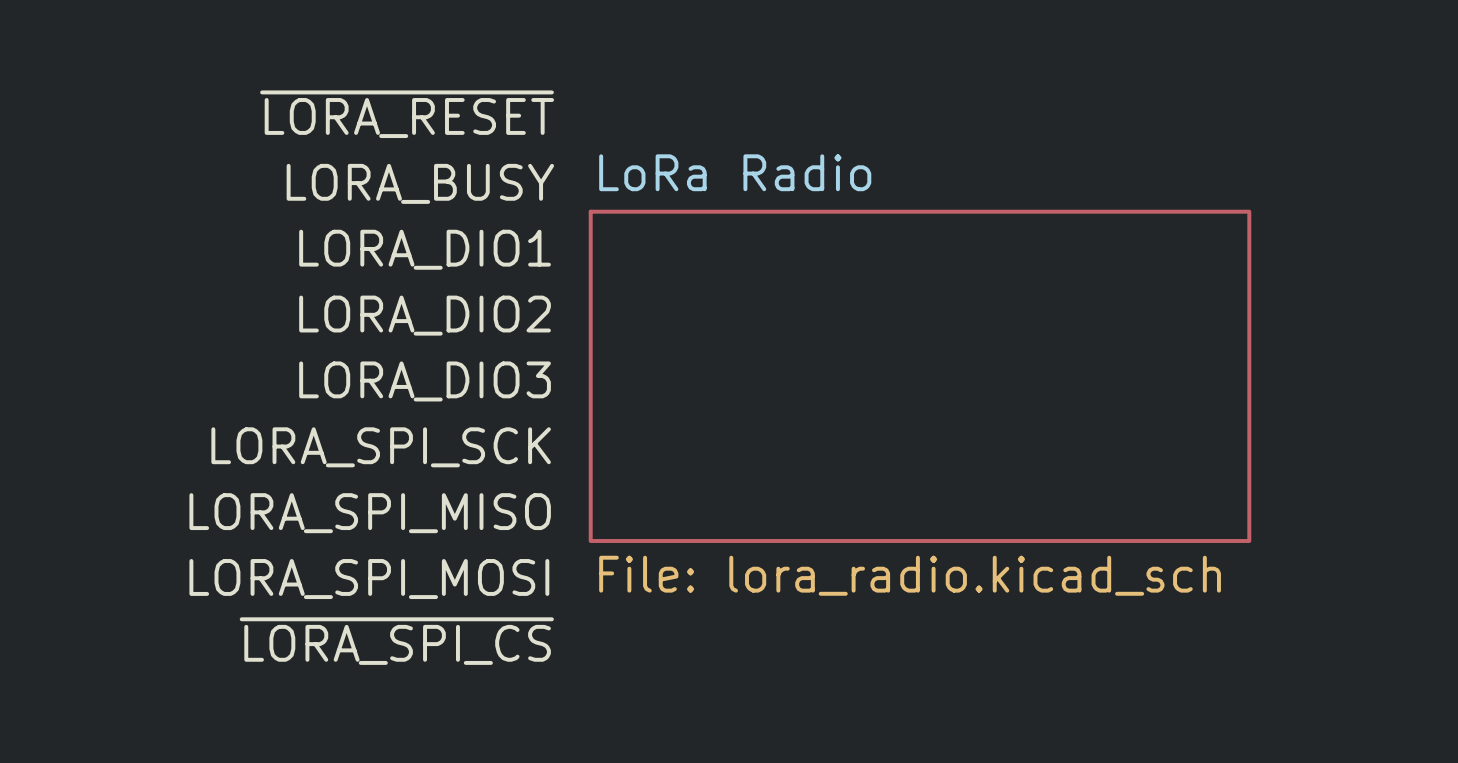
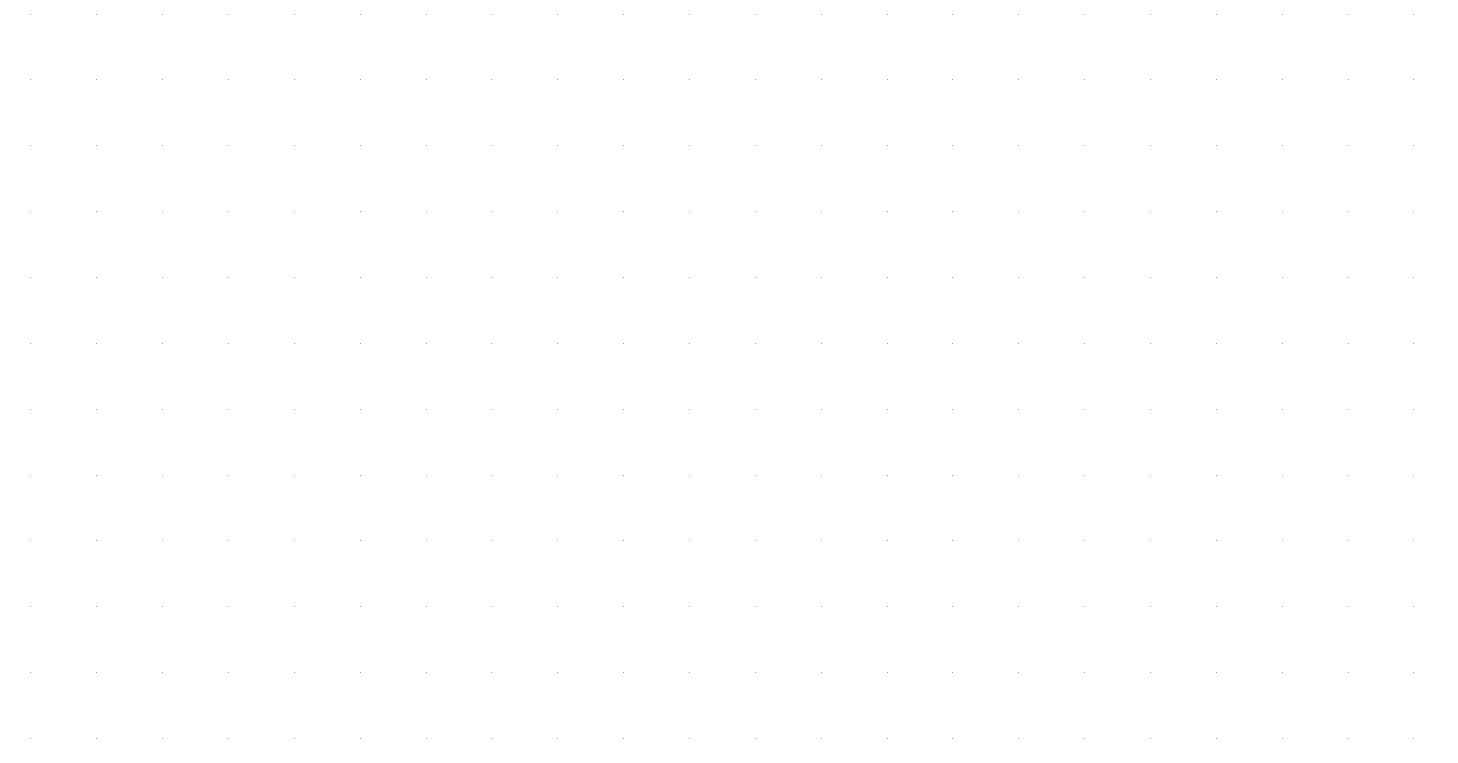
label: ~{LORA_RESET} (407, 114) -> none
label: LORA_BUSY (420, 183) -> none
label: LORA_DIO1 (425, 249) -> none
label: LORA_DIO2 (425, 315) -> none
sheet LoRa Radio: File: lora_radio.kicad_sch (920, 376) -> none
label: LORA_DIO3 (425, 381) -> none
label: LORA_SPI_SCK (381, 447) -> none
label: LORA_SPI_MISO (370, 513) -> none
label: LORA_SPI_MOSI (369, 579) -> none
label: ~{LORA_SPI_CS} (396, 641) -> none

